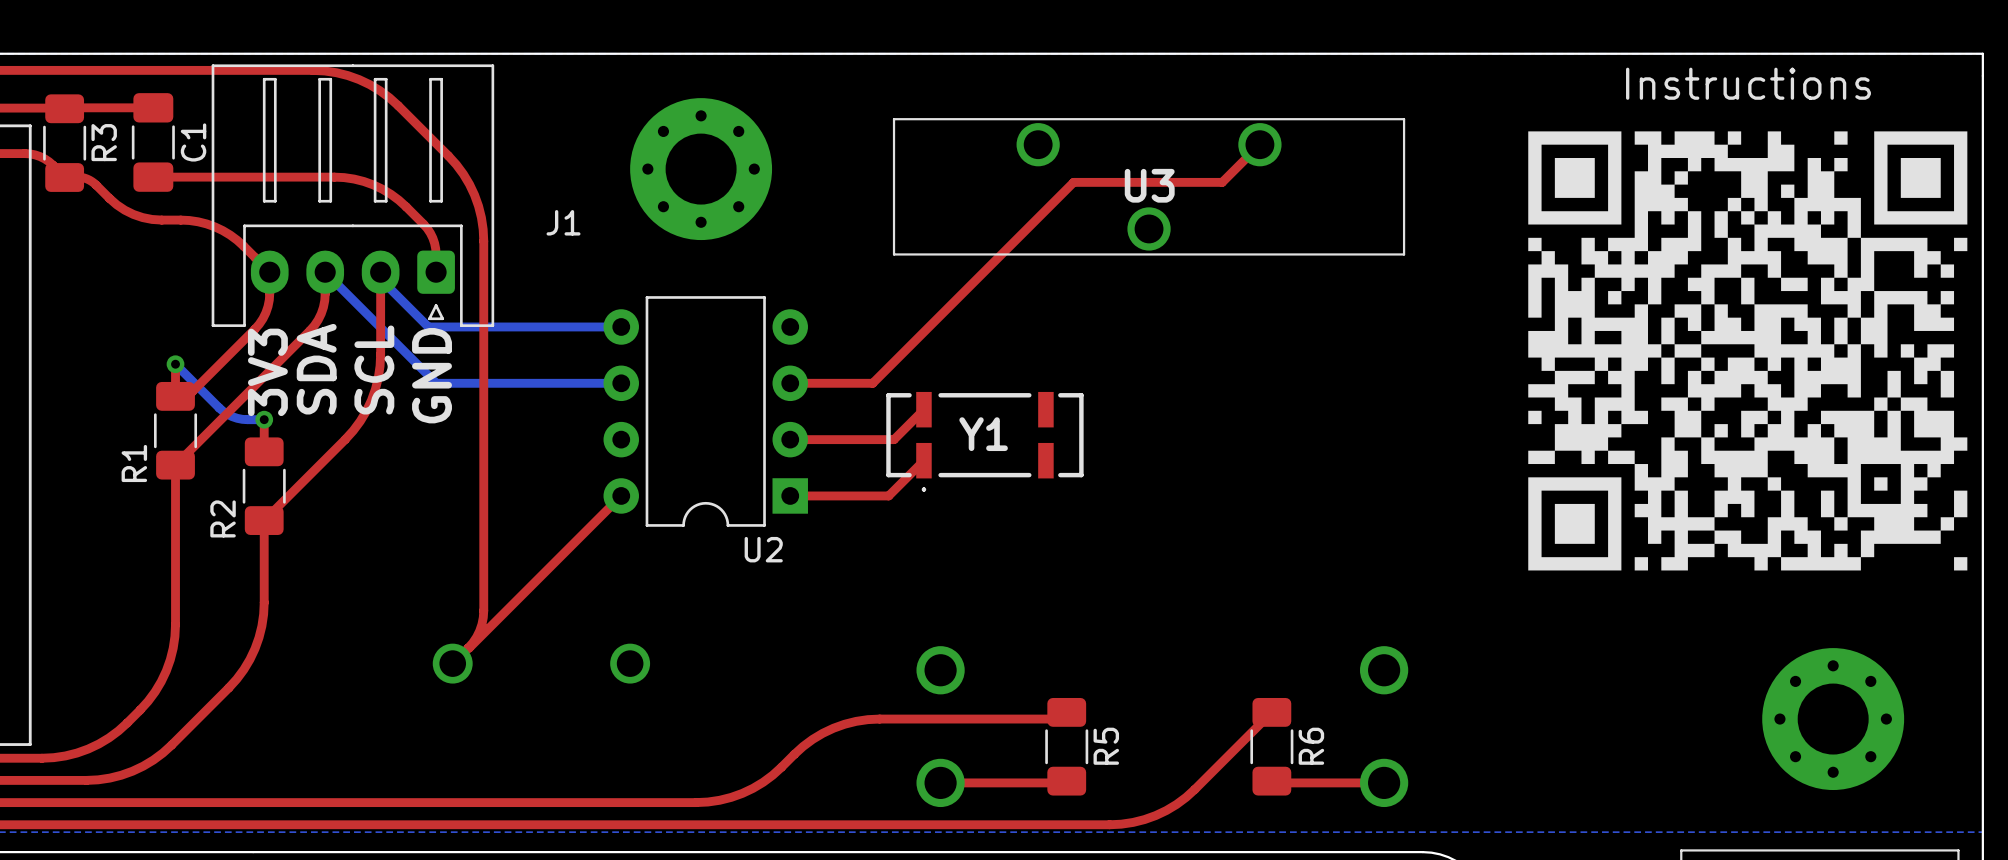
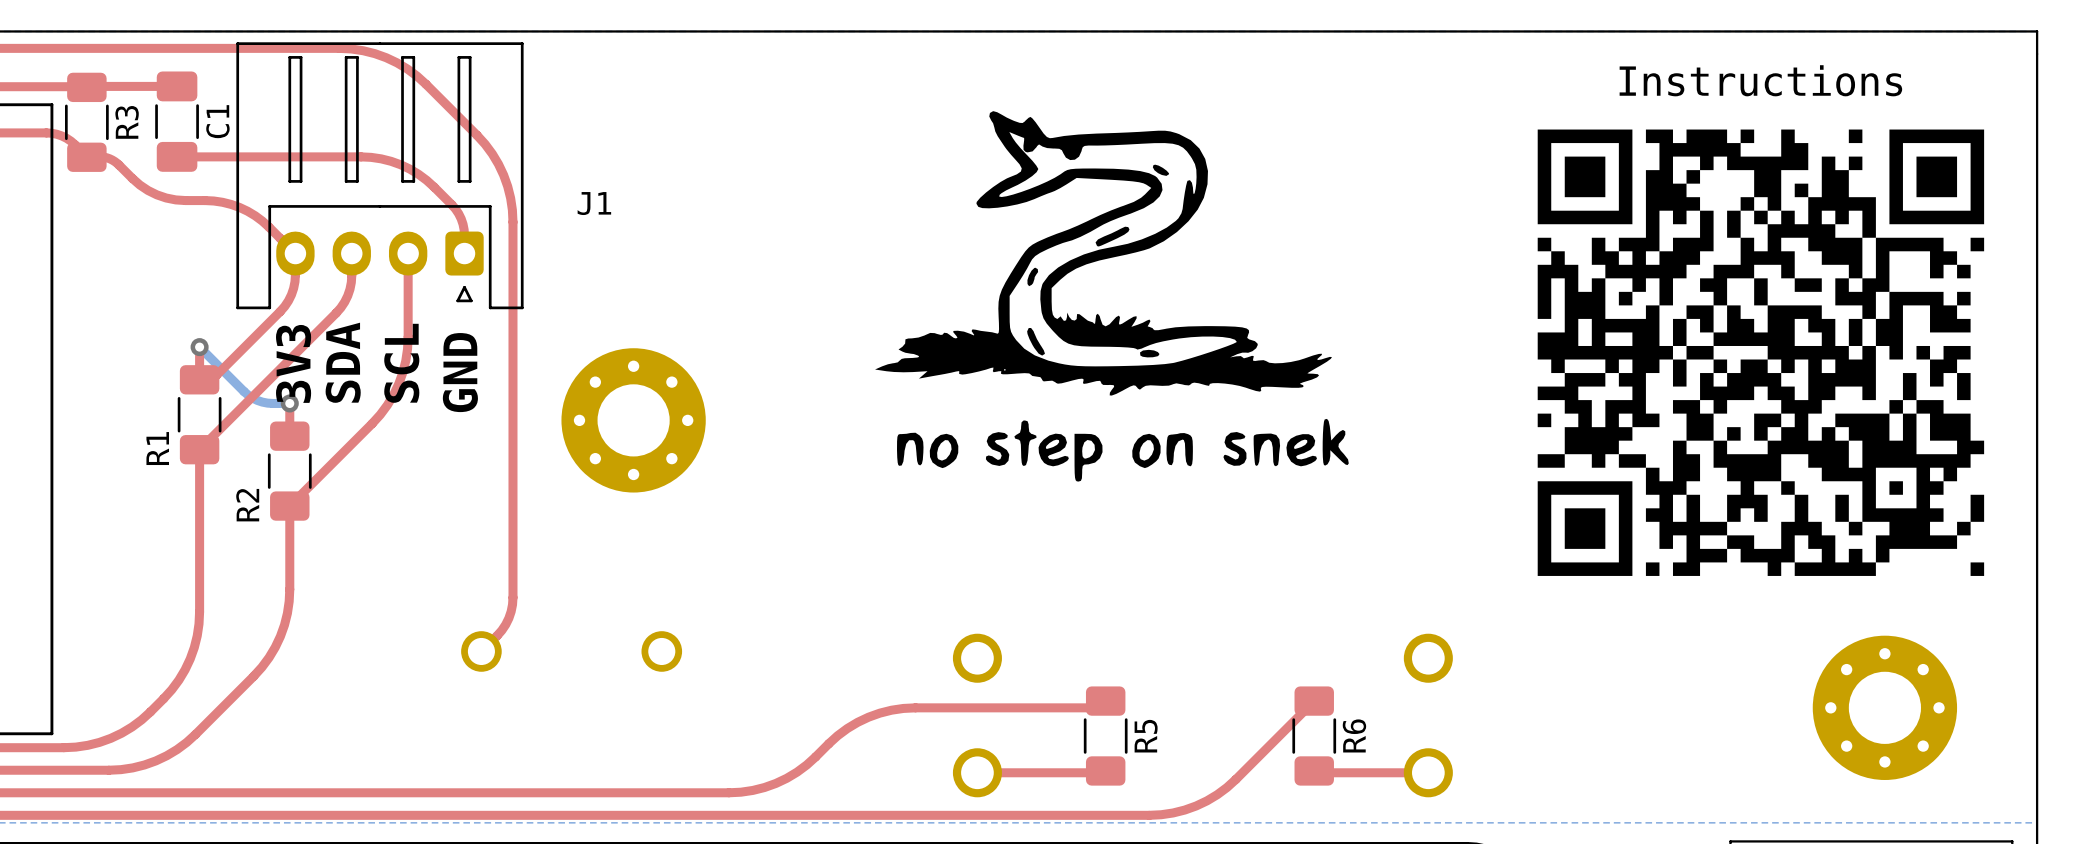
drawing: none -> [875, 111, 1349, 482]
top track: (1259, 144) (1222, 182) (1073, 182) (872, 383) (790, 383) -> none
part position: (701, 169) -> (633, 420)
U3: (1149, 186) -> none
bottom track: (325, 272) (436, 383) (621, 383) -> none
bottom track: (380, 272) (380, 279) (428, 326) (621, 326) -> none
drawing position: (1747, 350) -> (1760, 352)
top track: (923, 409) (894, 439) (790, 439) -> none
U2: (705, 411) -> none
Y1: (984, 441) -> none
top track: (923, 460) (888, 495) (790, 495) -> none
top track: (621, 495) (468, 648) -> none

